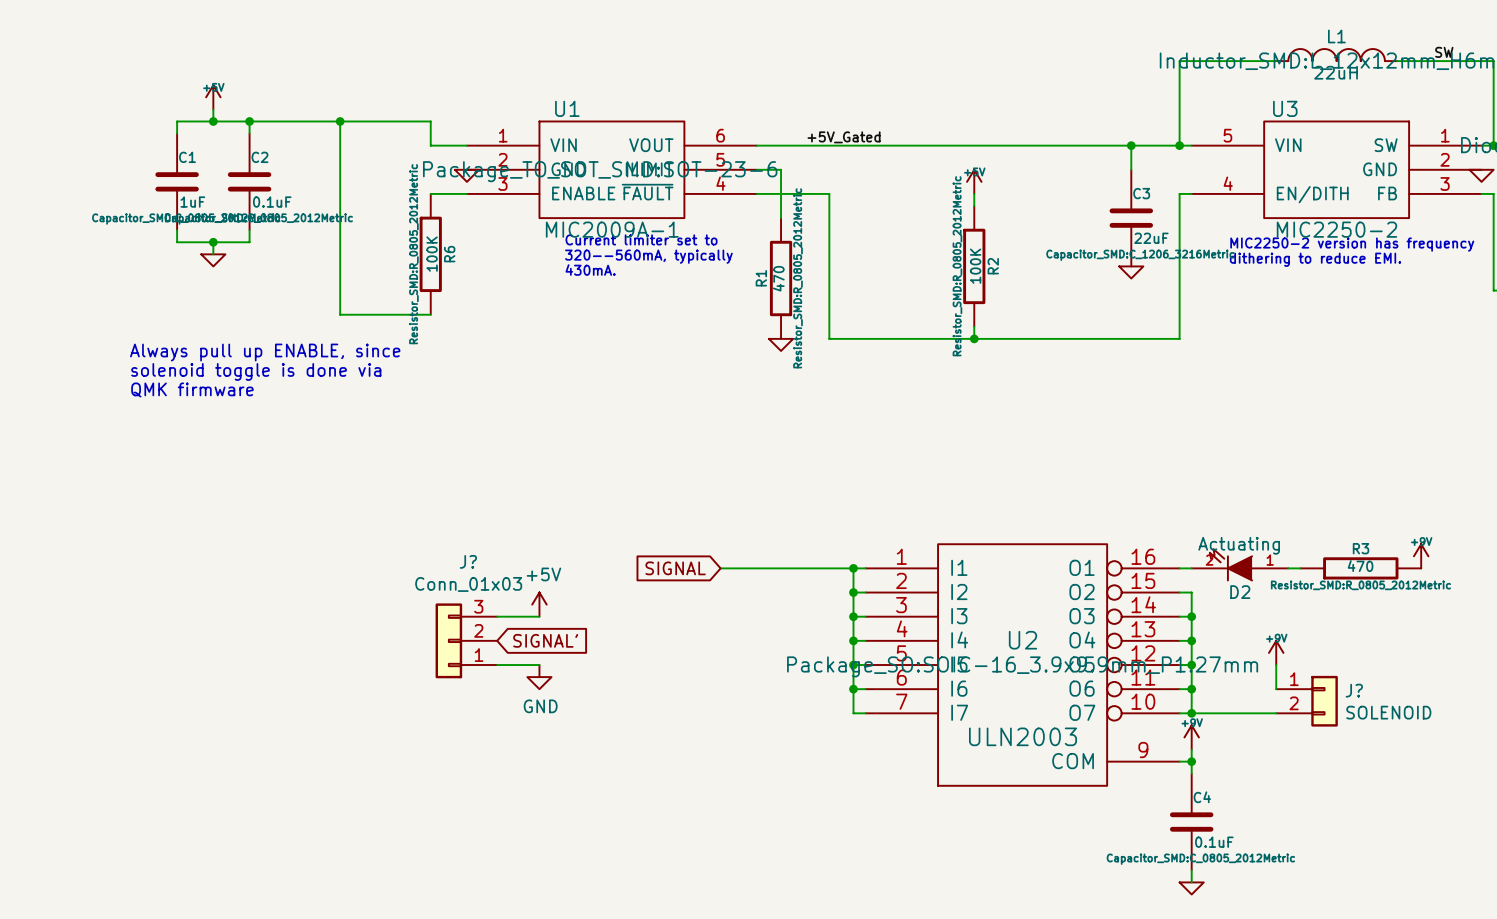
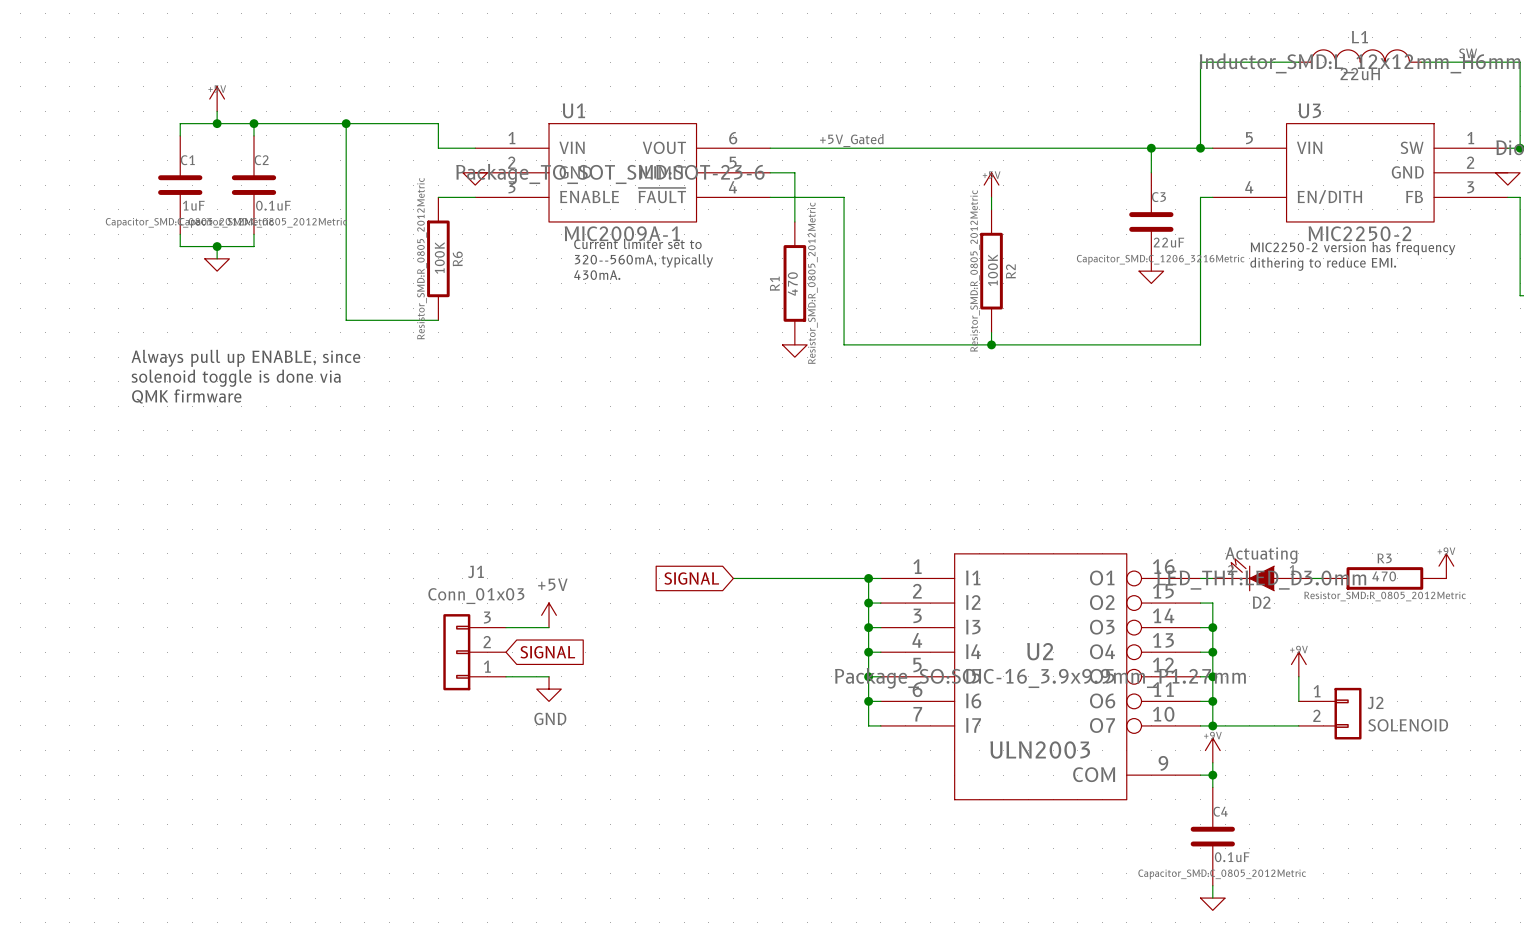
J? name: J? (468, 561) -> J1 (475, 571)
D2 text: none -> LED_THT:LED_D3.0mm (1261, 580)
global label: SIGNAL' (545, 640) -> SIGNAL (547, 652)
J? name: J? (1354, 690) -> J2 (1375, 702)

